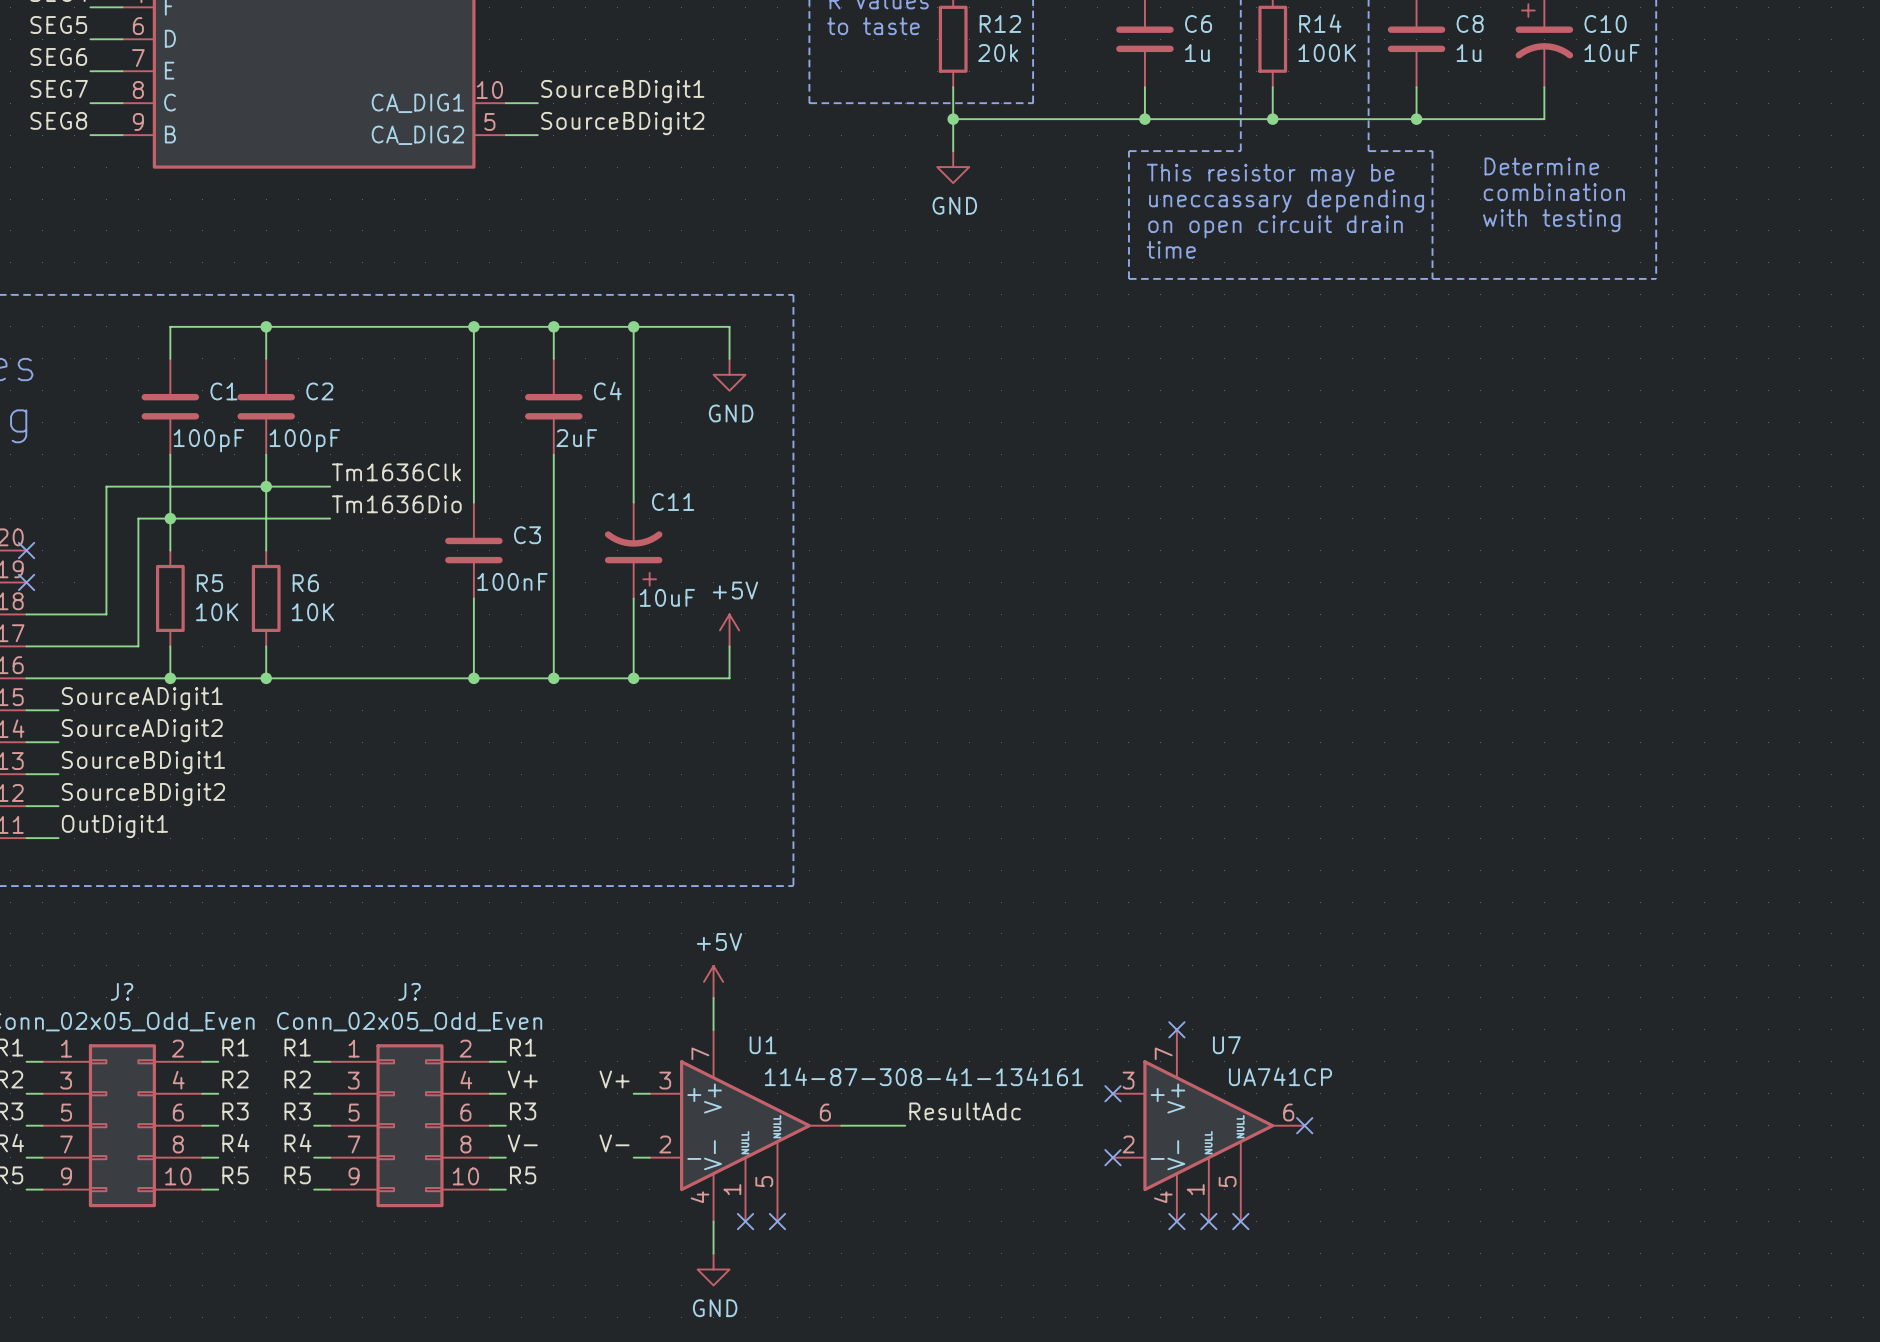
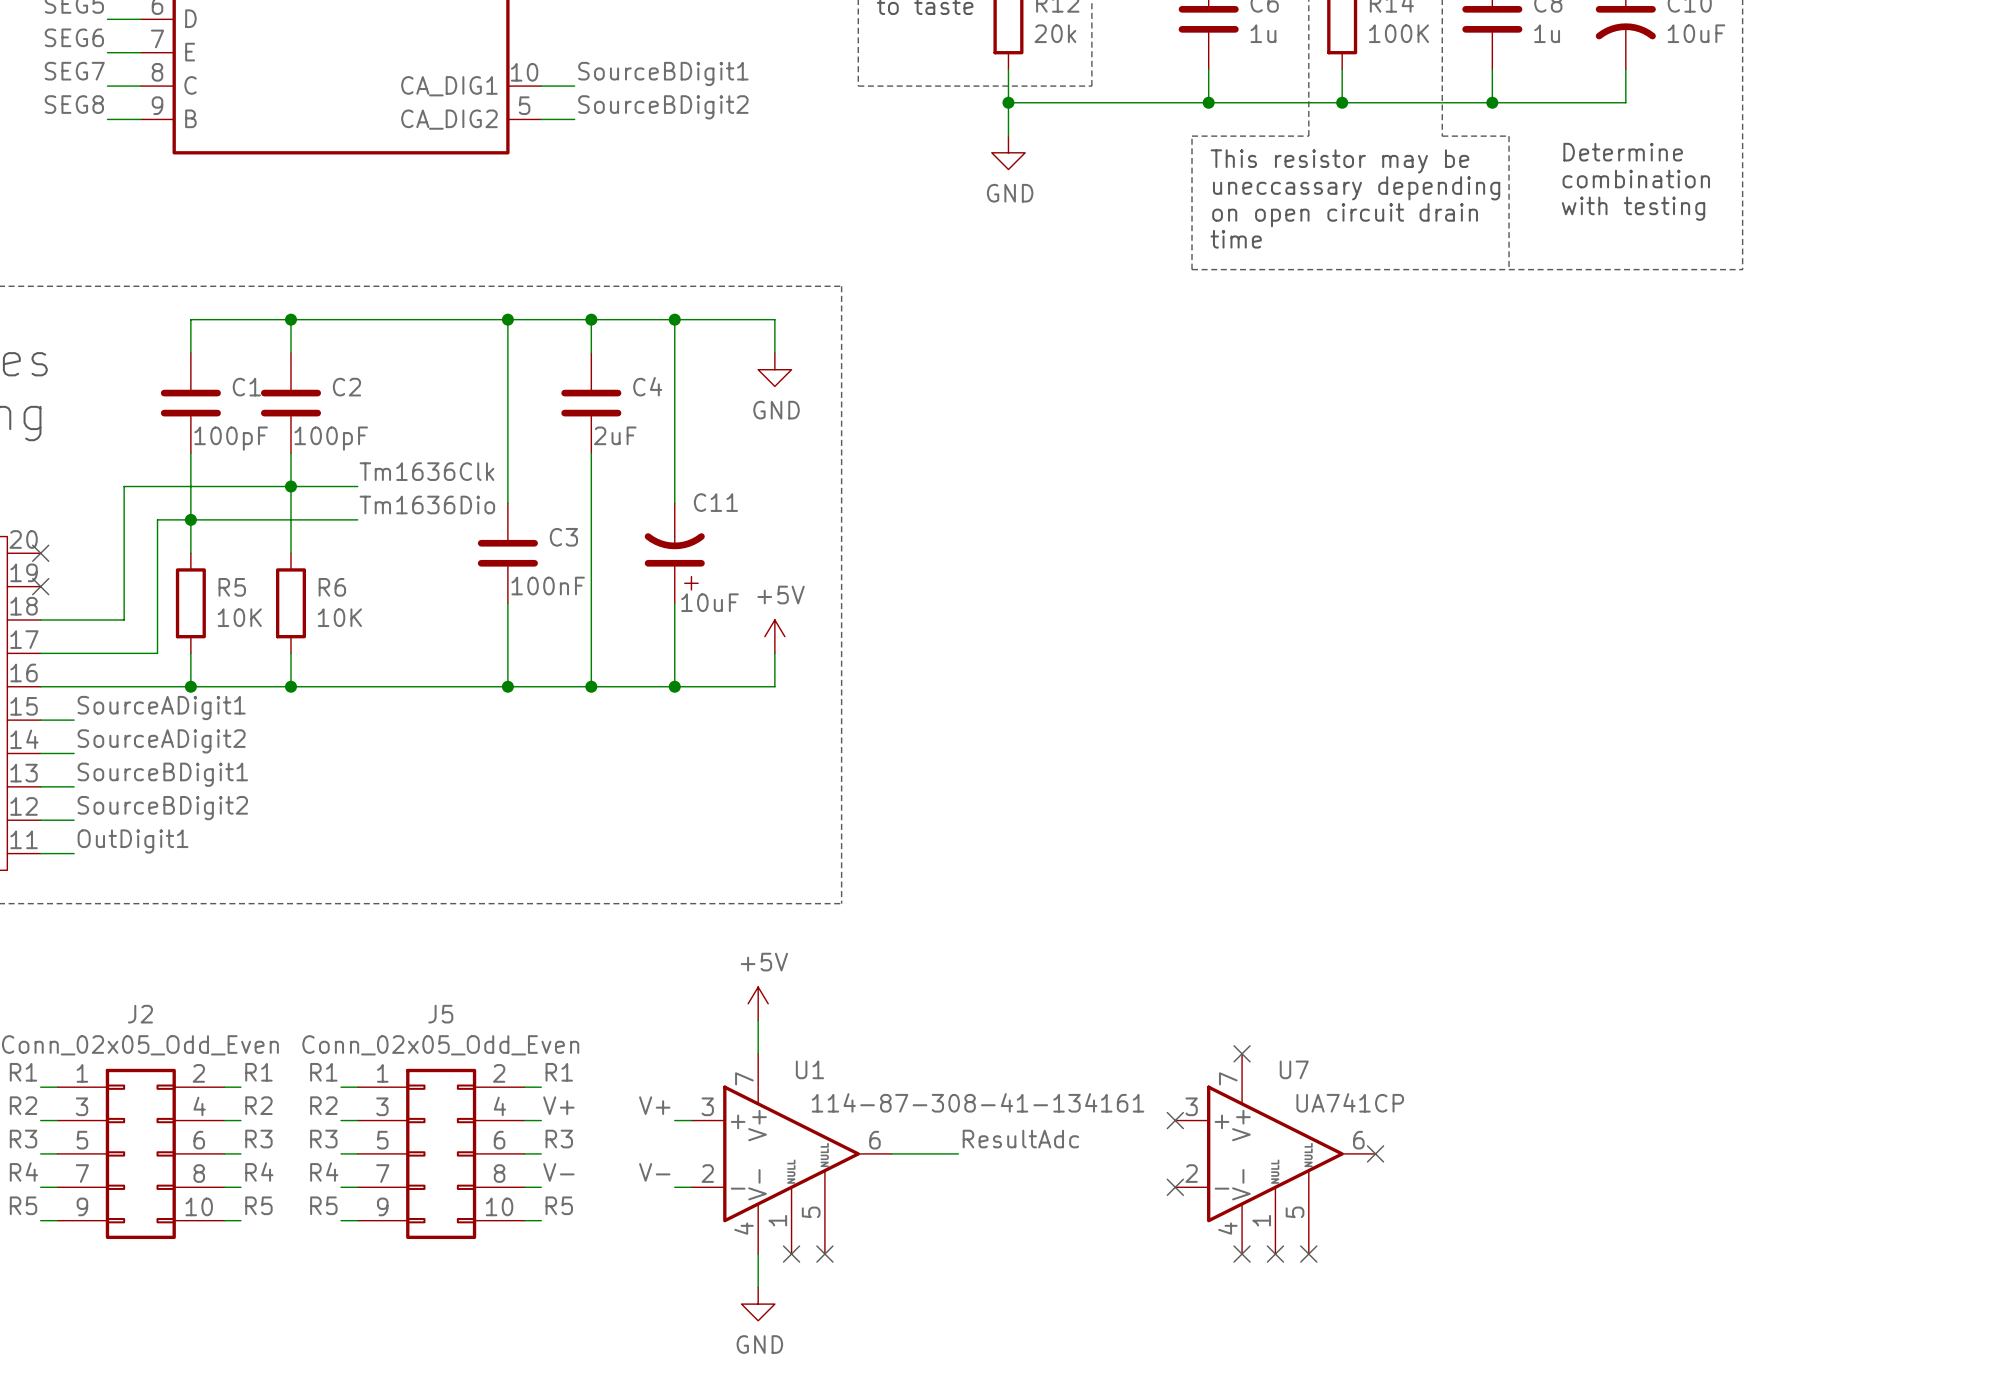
J? name: J? (122, 991) -> J2 (140, 1014)
J? name: J? (409, 991) -> J5 (440, 1014)

